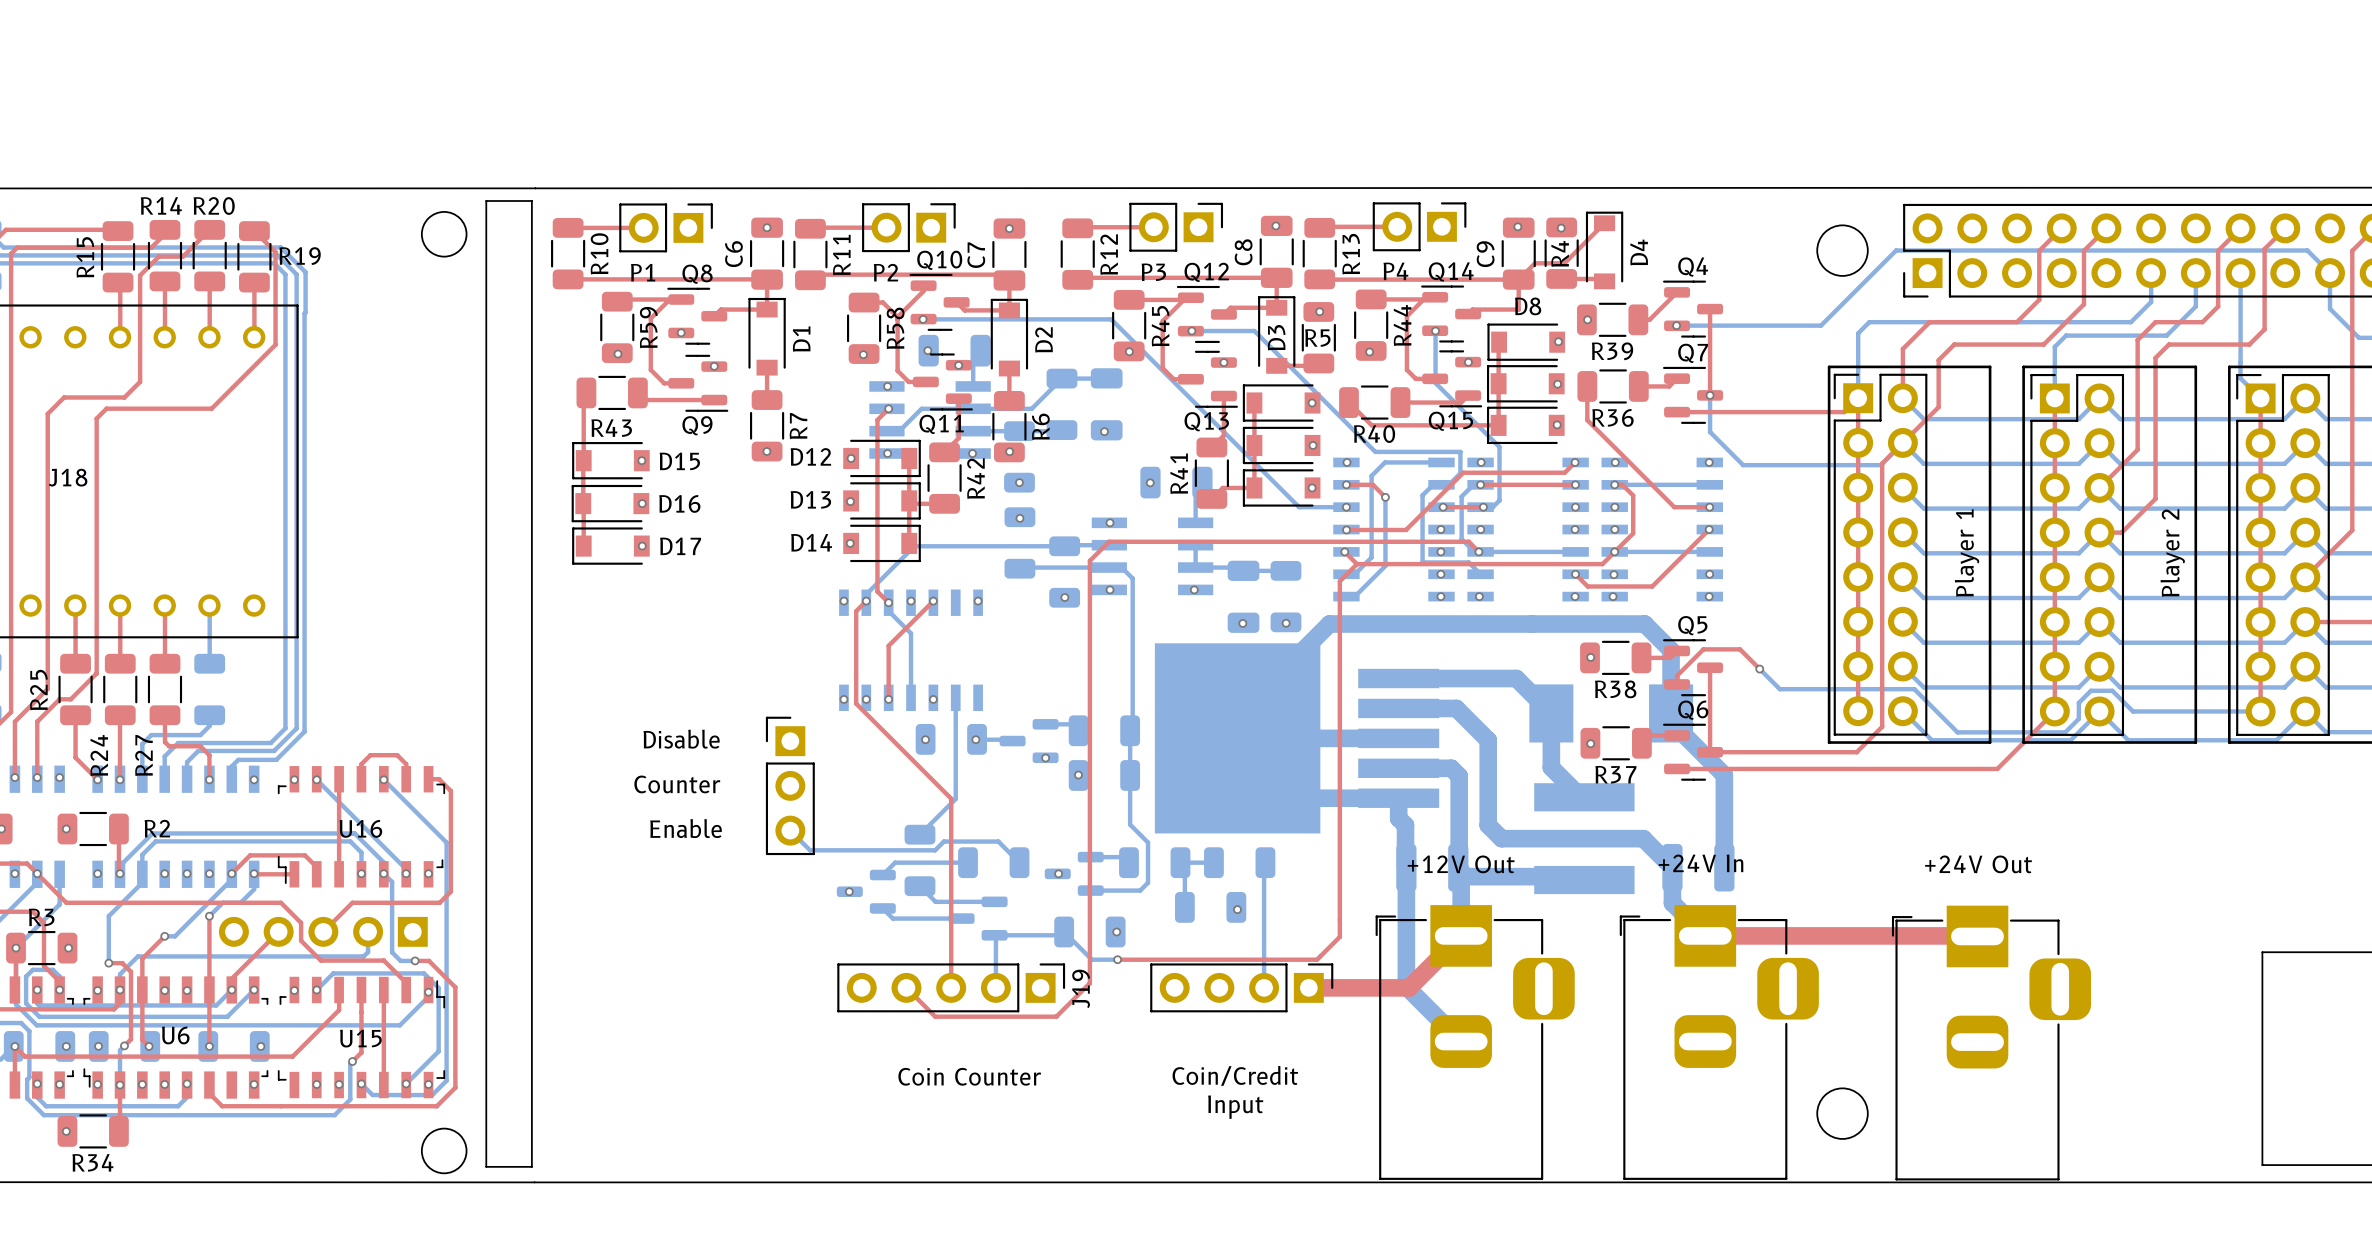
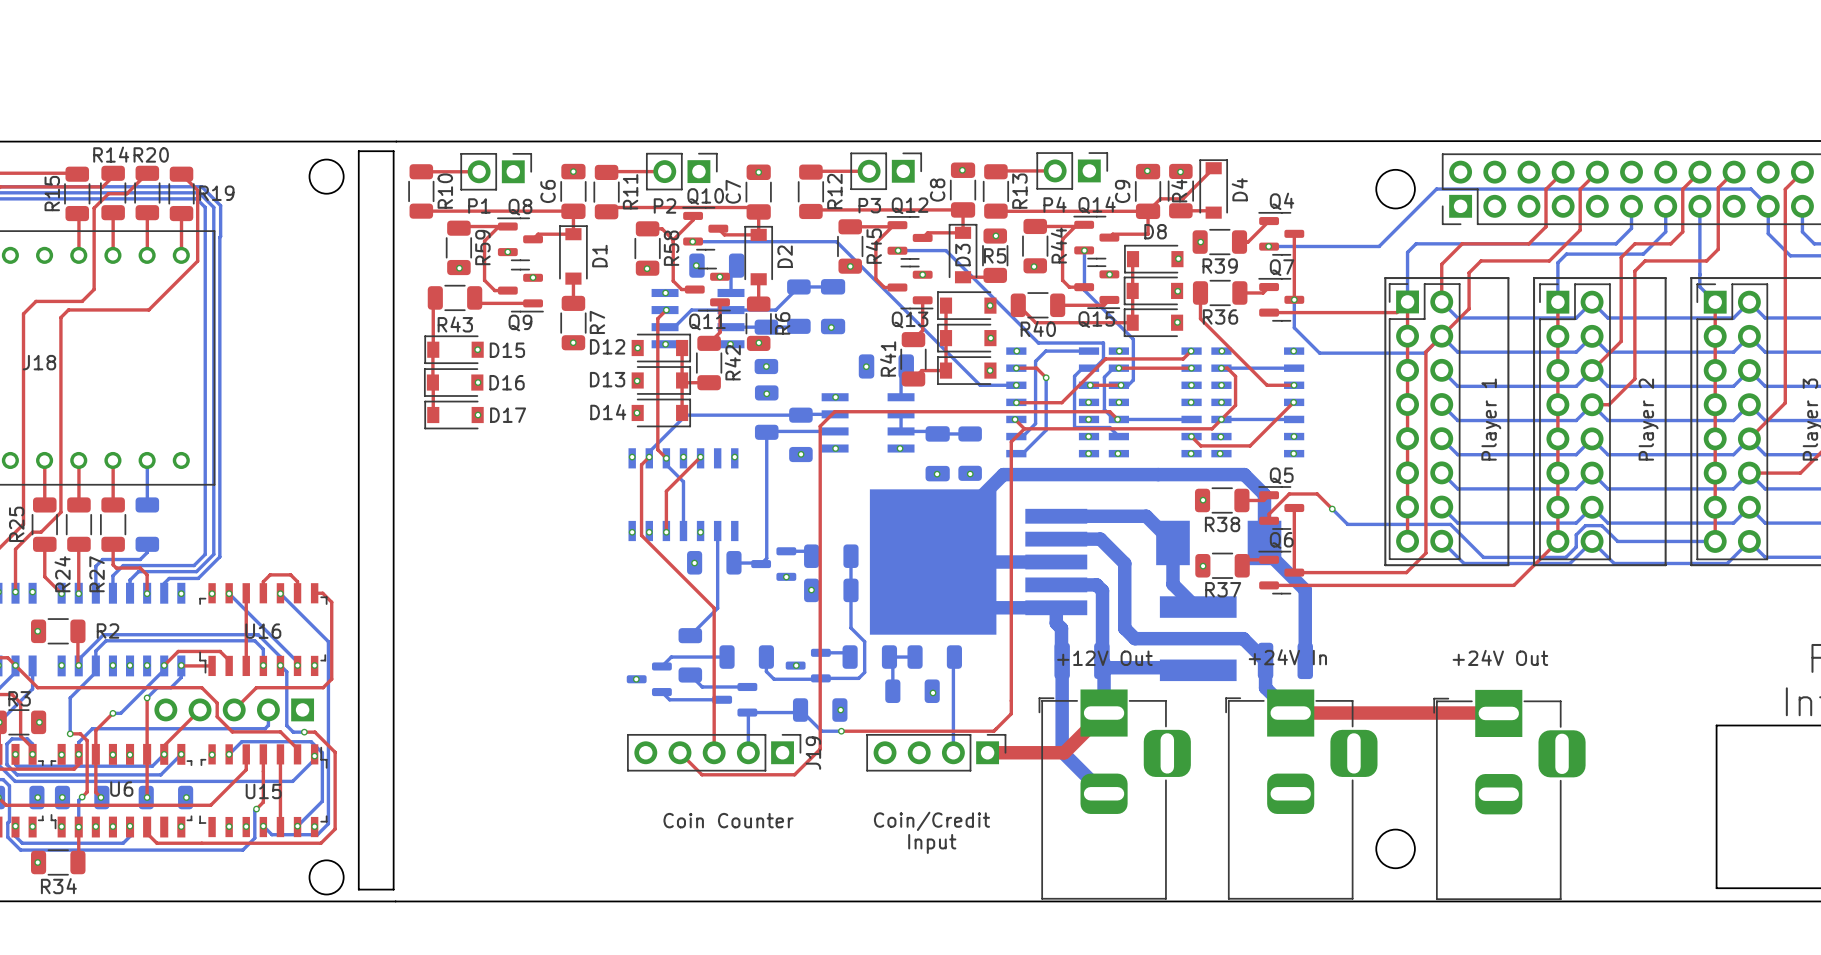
bottom track: (1109, 567) (1121, 567) (1132, 578) (1132, 728) (1130, 730) -> none
bottom track: none -> (766, 432) (766, 558) (761, 564)
text: Disable (681, 739) -> none
via: (975, 739) -> none
text: Counter (677, 784) -> none
part: (790, 785) -> none
text: Enable (686, 828) -> none
bottom track: (790, 830) (810, 850) (935, 850) (943, 841) (998, 841) (1019, 862) -> (819, 679) (774, 679) (766, 671) (766, 657)

